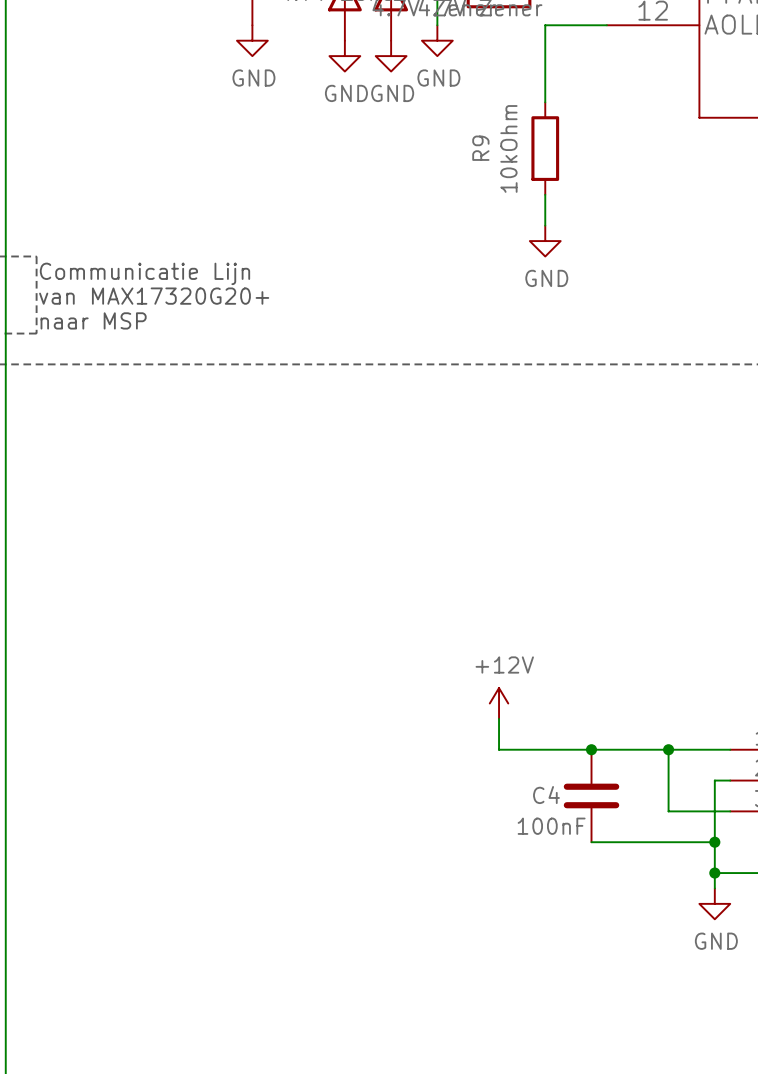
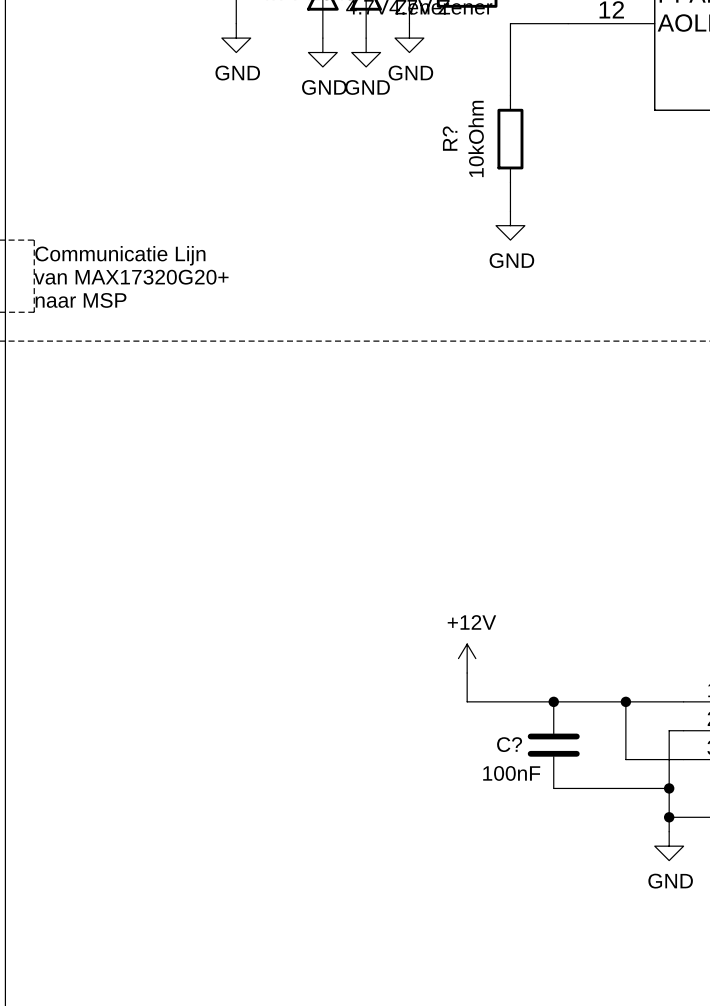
R9 name: R9 (480, 148) -> R? (450, 138)
C4 name: C4 (546, 795) -> C? (509, 744)

